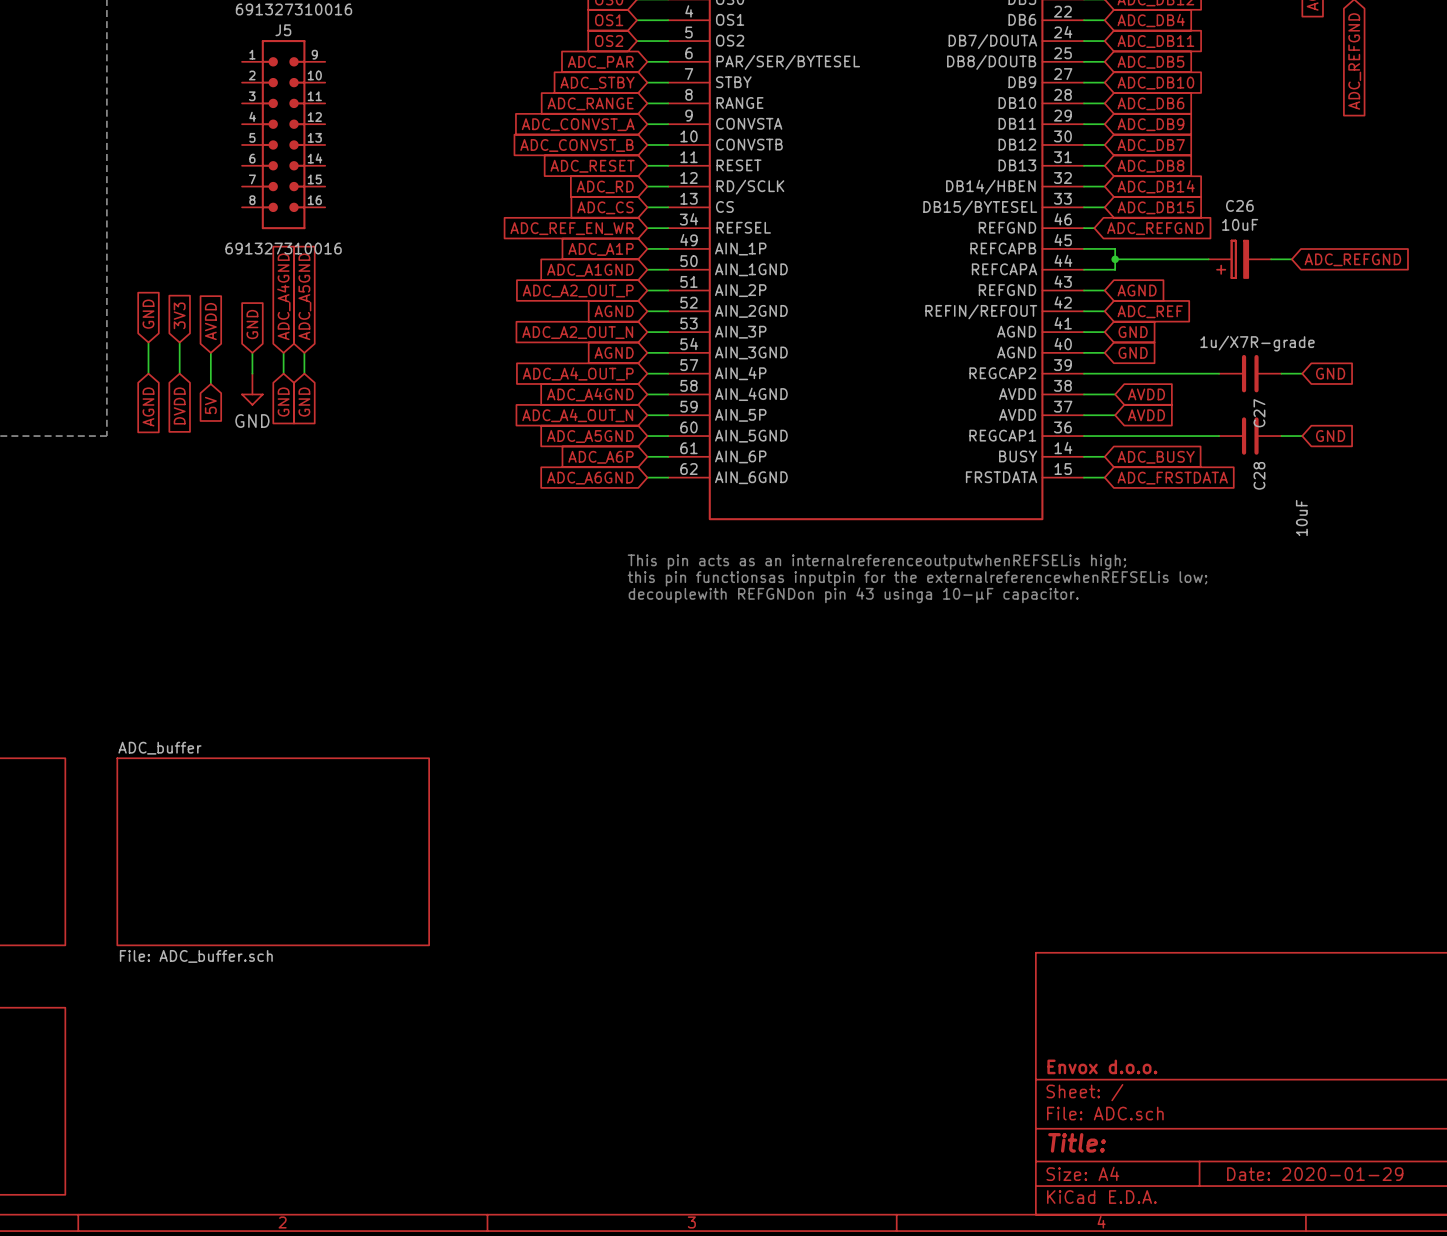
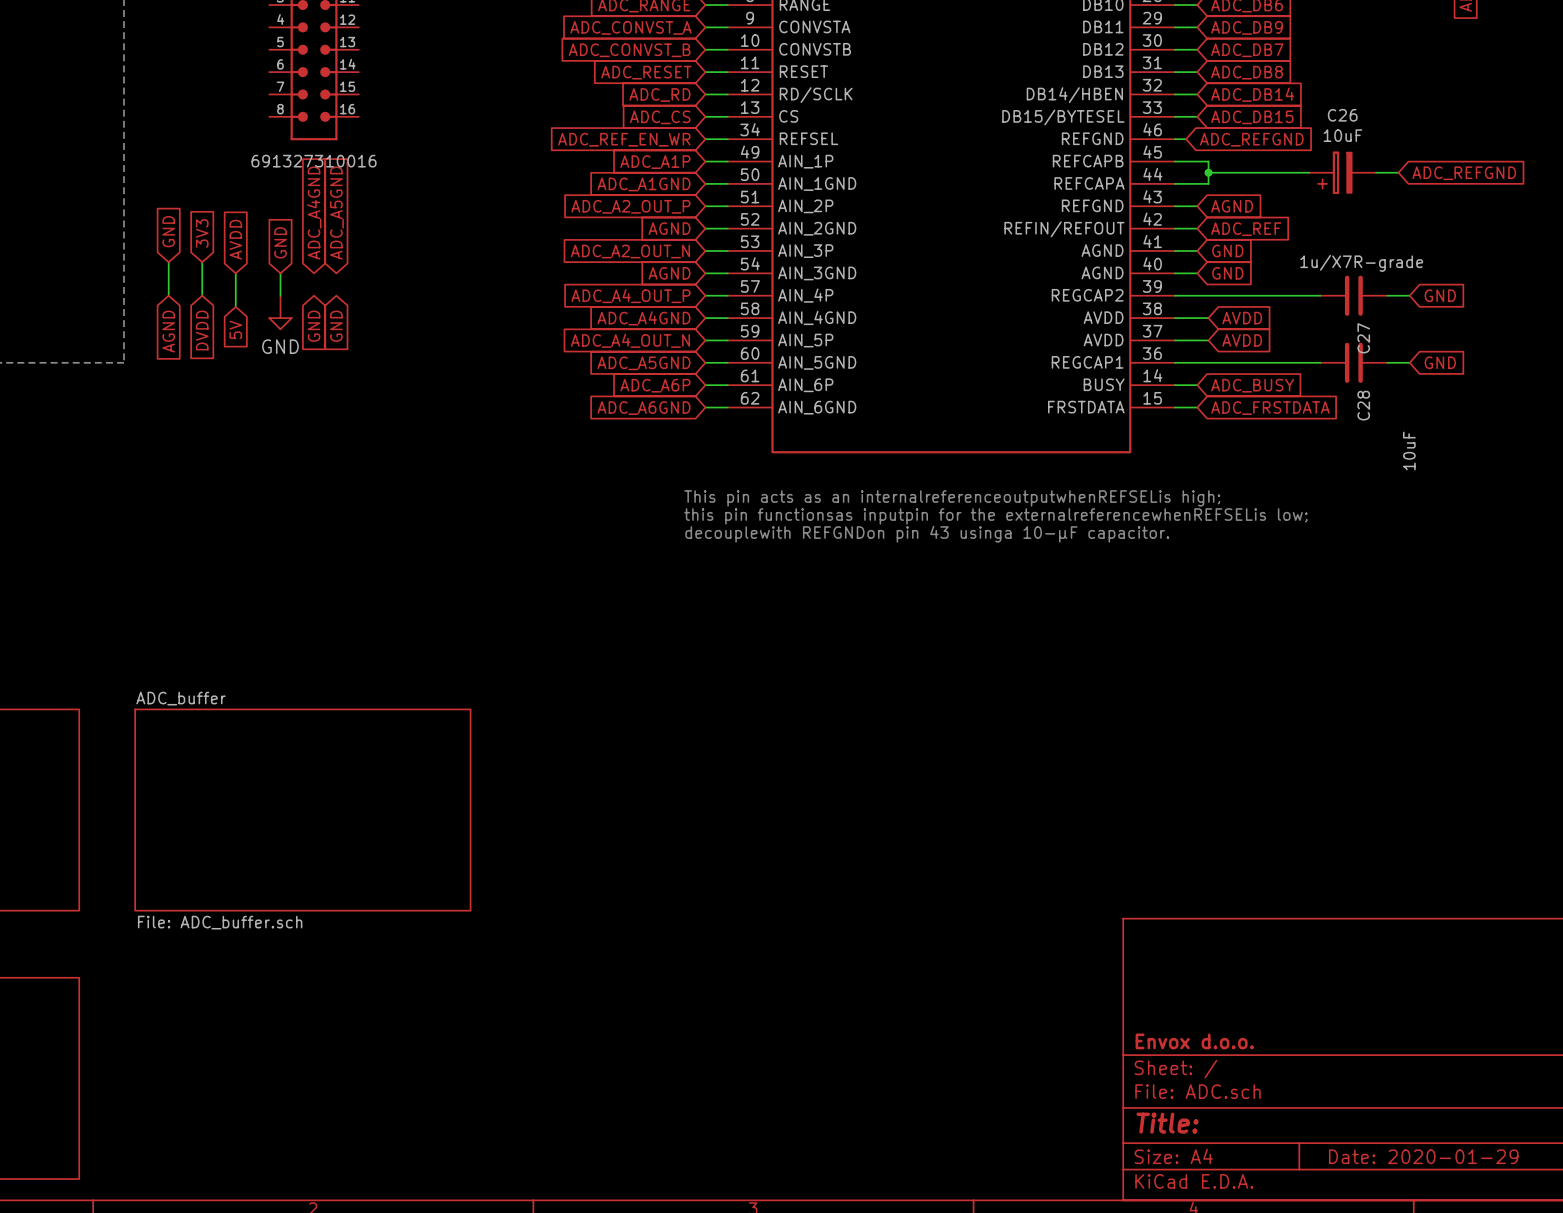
wire: (283, 352) (283, 373) -> none
wire: (304, 352) (304, 373) -> none

